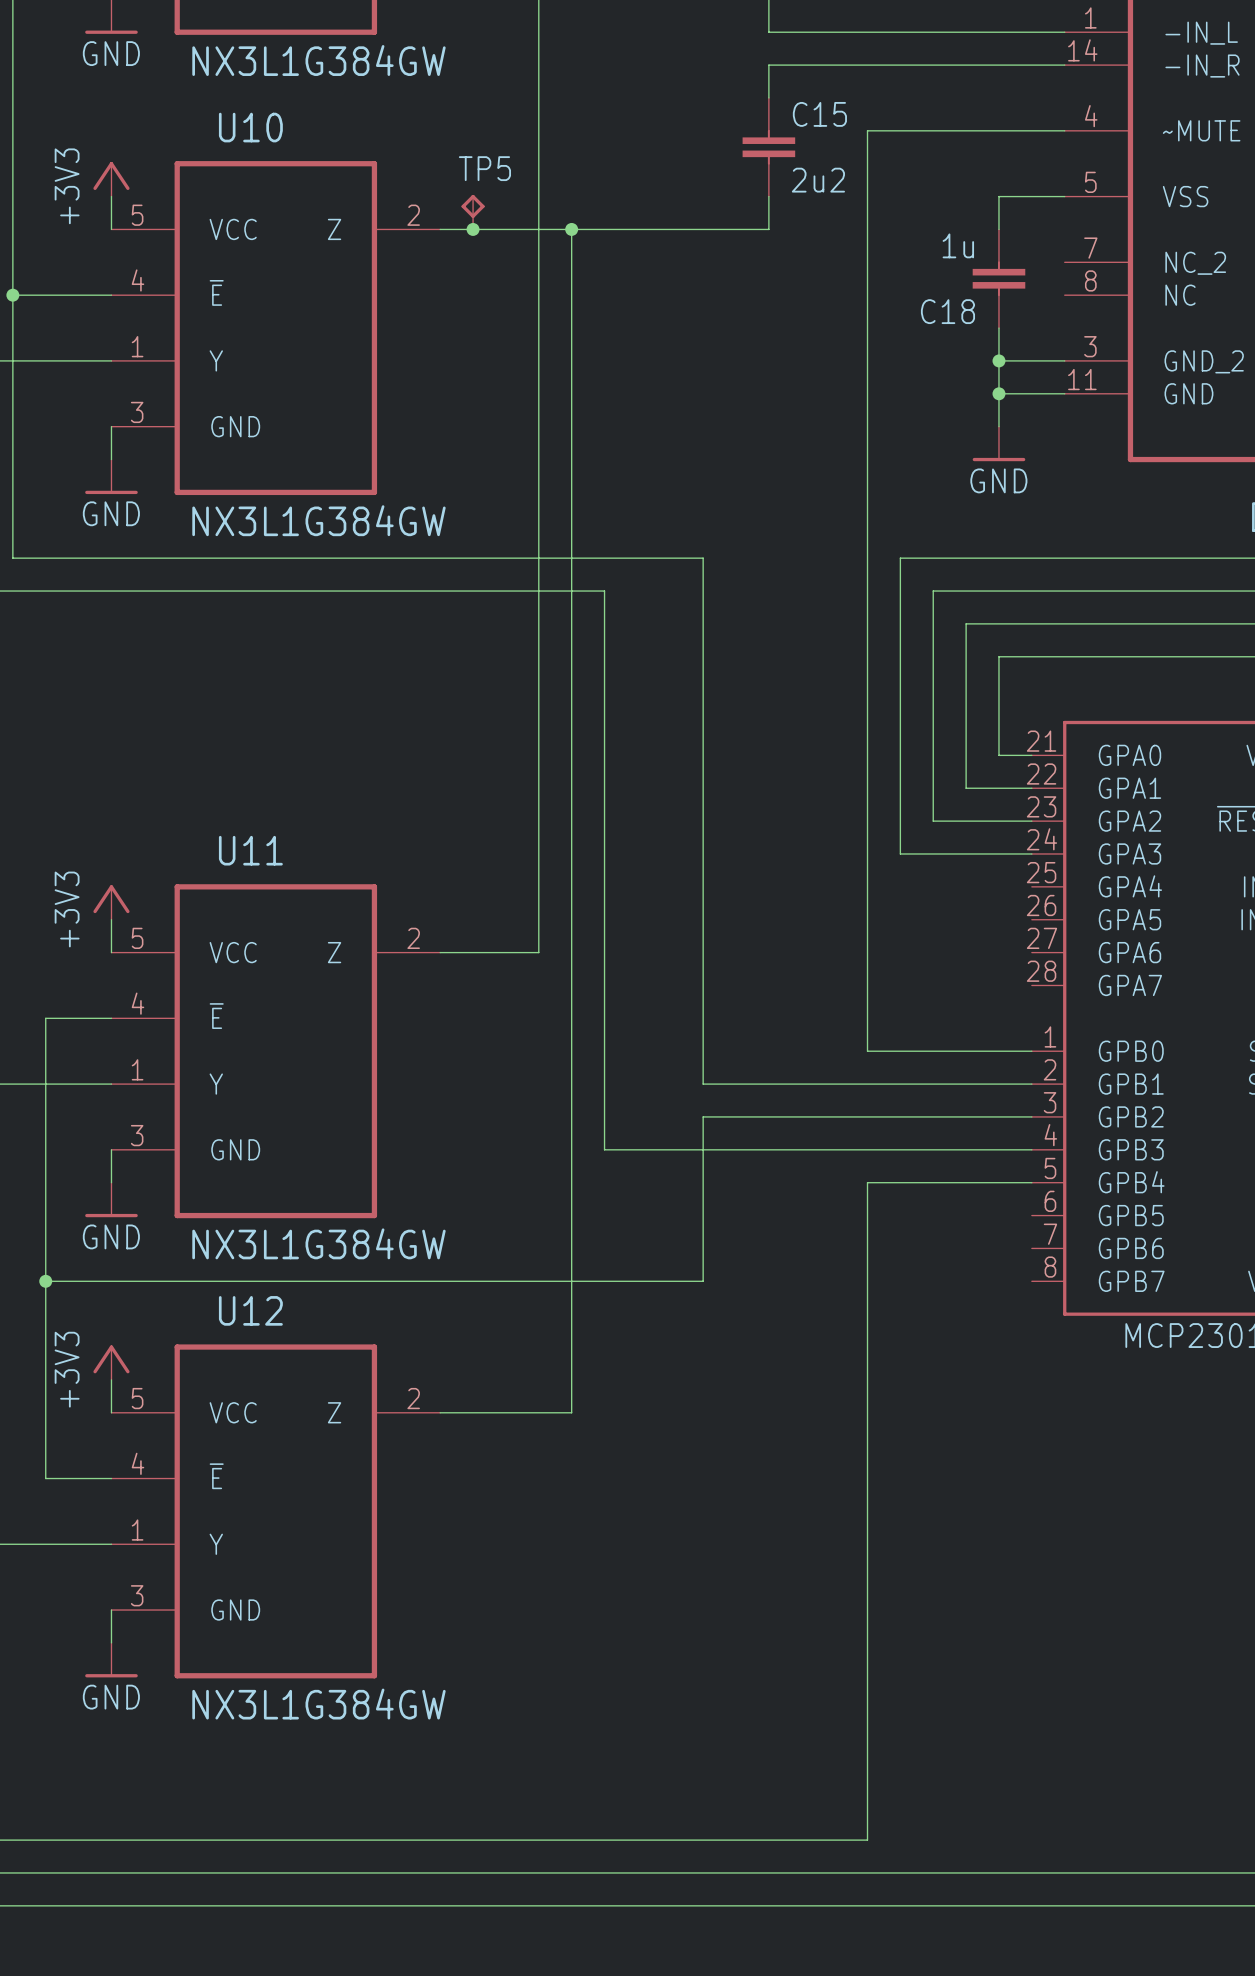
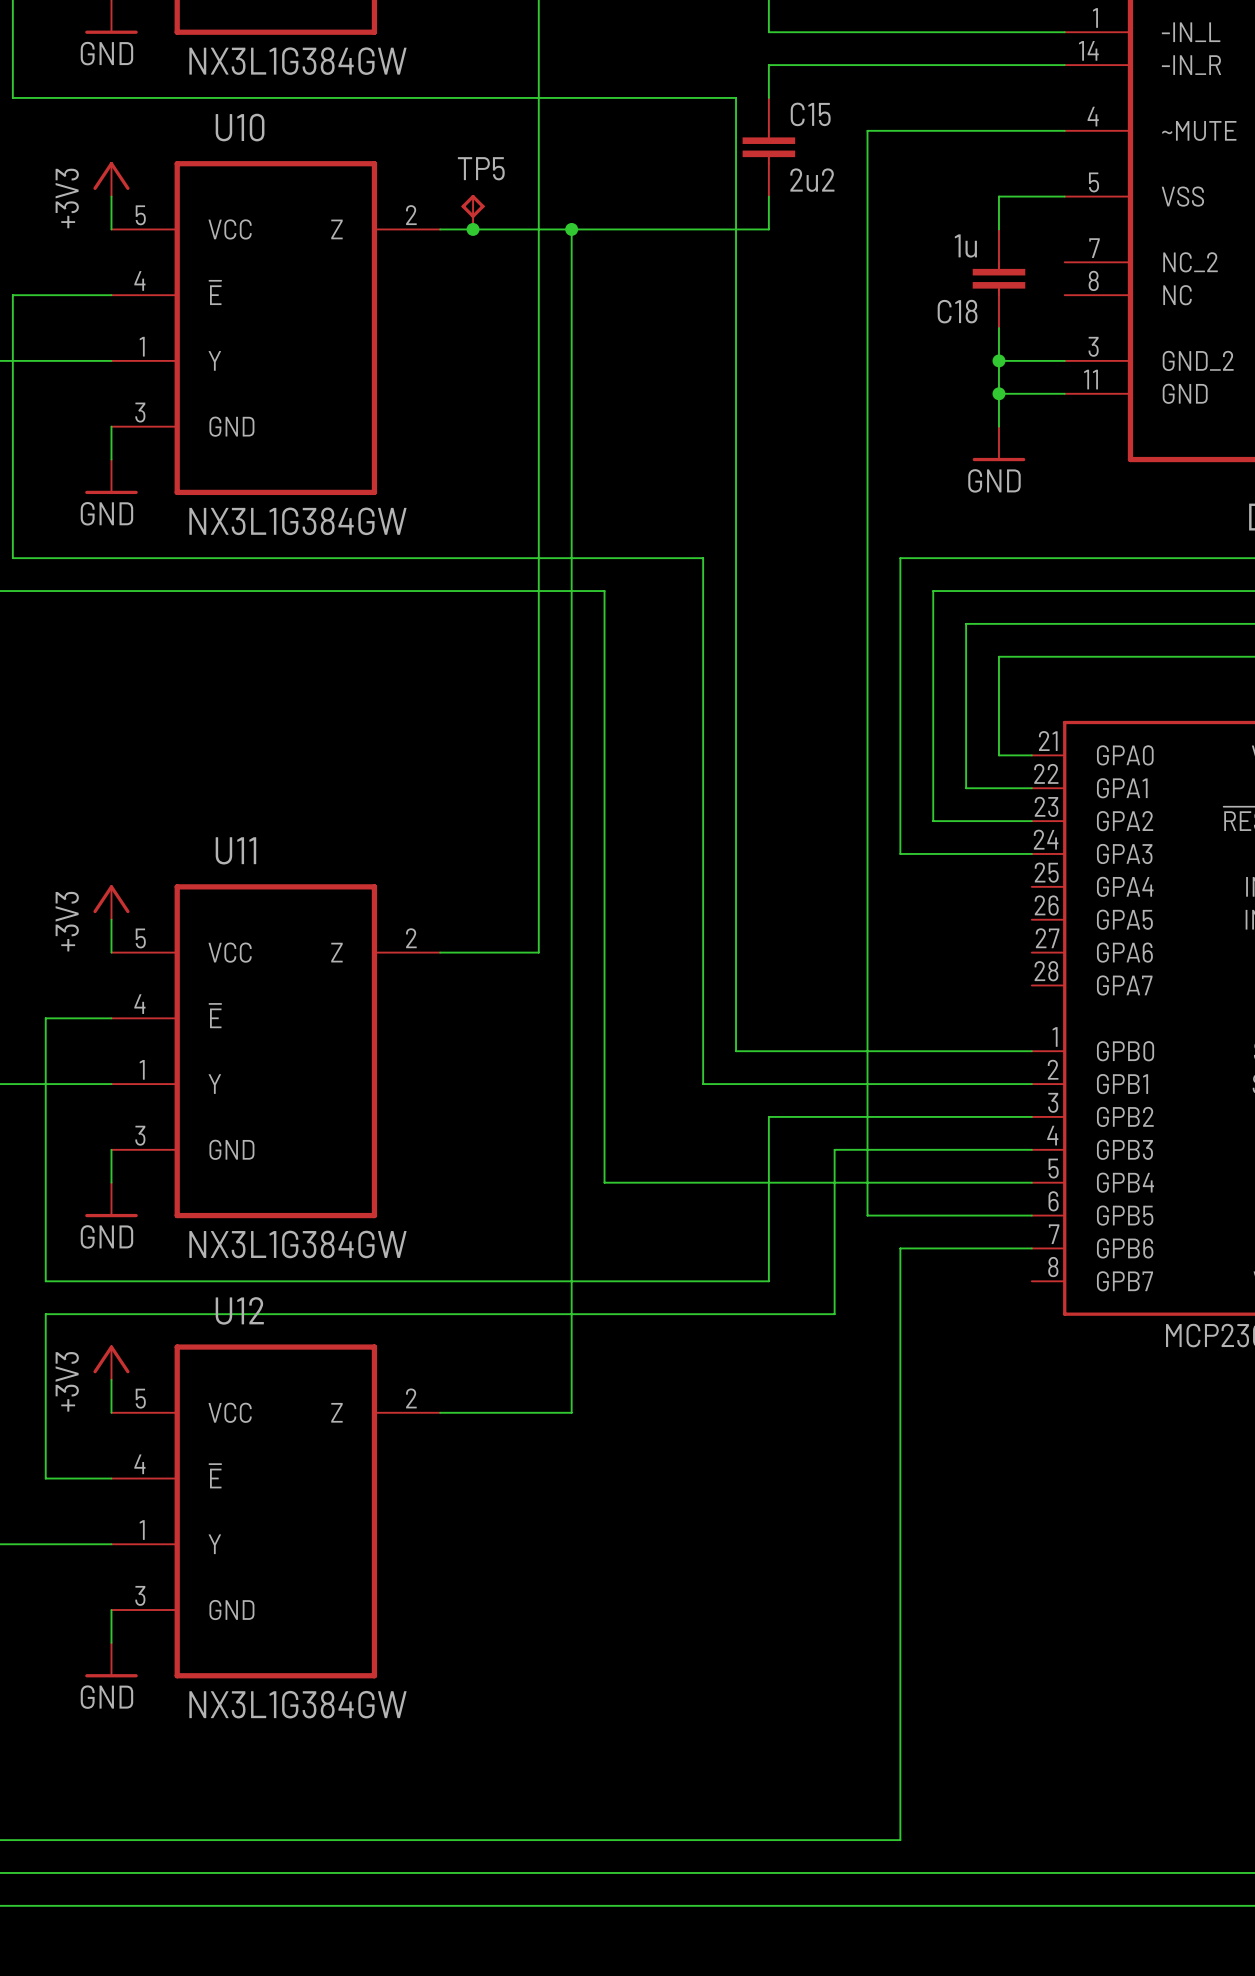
wire: (12, 97) (12, 295) -> (12, 97) (736, 97) (736, 1051) (867, 1051) (867, 1182) (604, 1182) (604, 1149)
junction: (12, 295) -> none
wire: (768, 1116) (703, 1116) (703, 1281) -> (768, 1116) (768, 1281) (703, 1281)
wire: (604, 1149) (834, 1149) -> (45, 1314) (834, 1314) (834, 1149)
wire: (867, 1215) (867, 1840) -> (1031, 1248) (900, 1248) (900, 1840) (867, 1840)
wire: none -> (867, 1215) (1031, 1215)
wire: (45, 1281) (45, 1314) -> none
junction: (45, 1281) -> none

